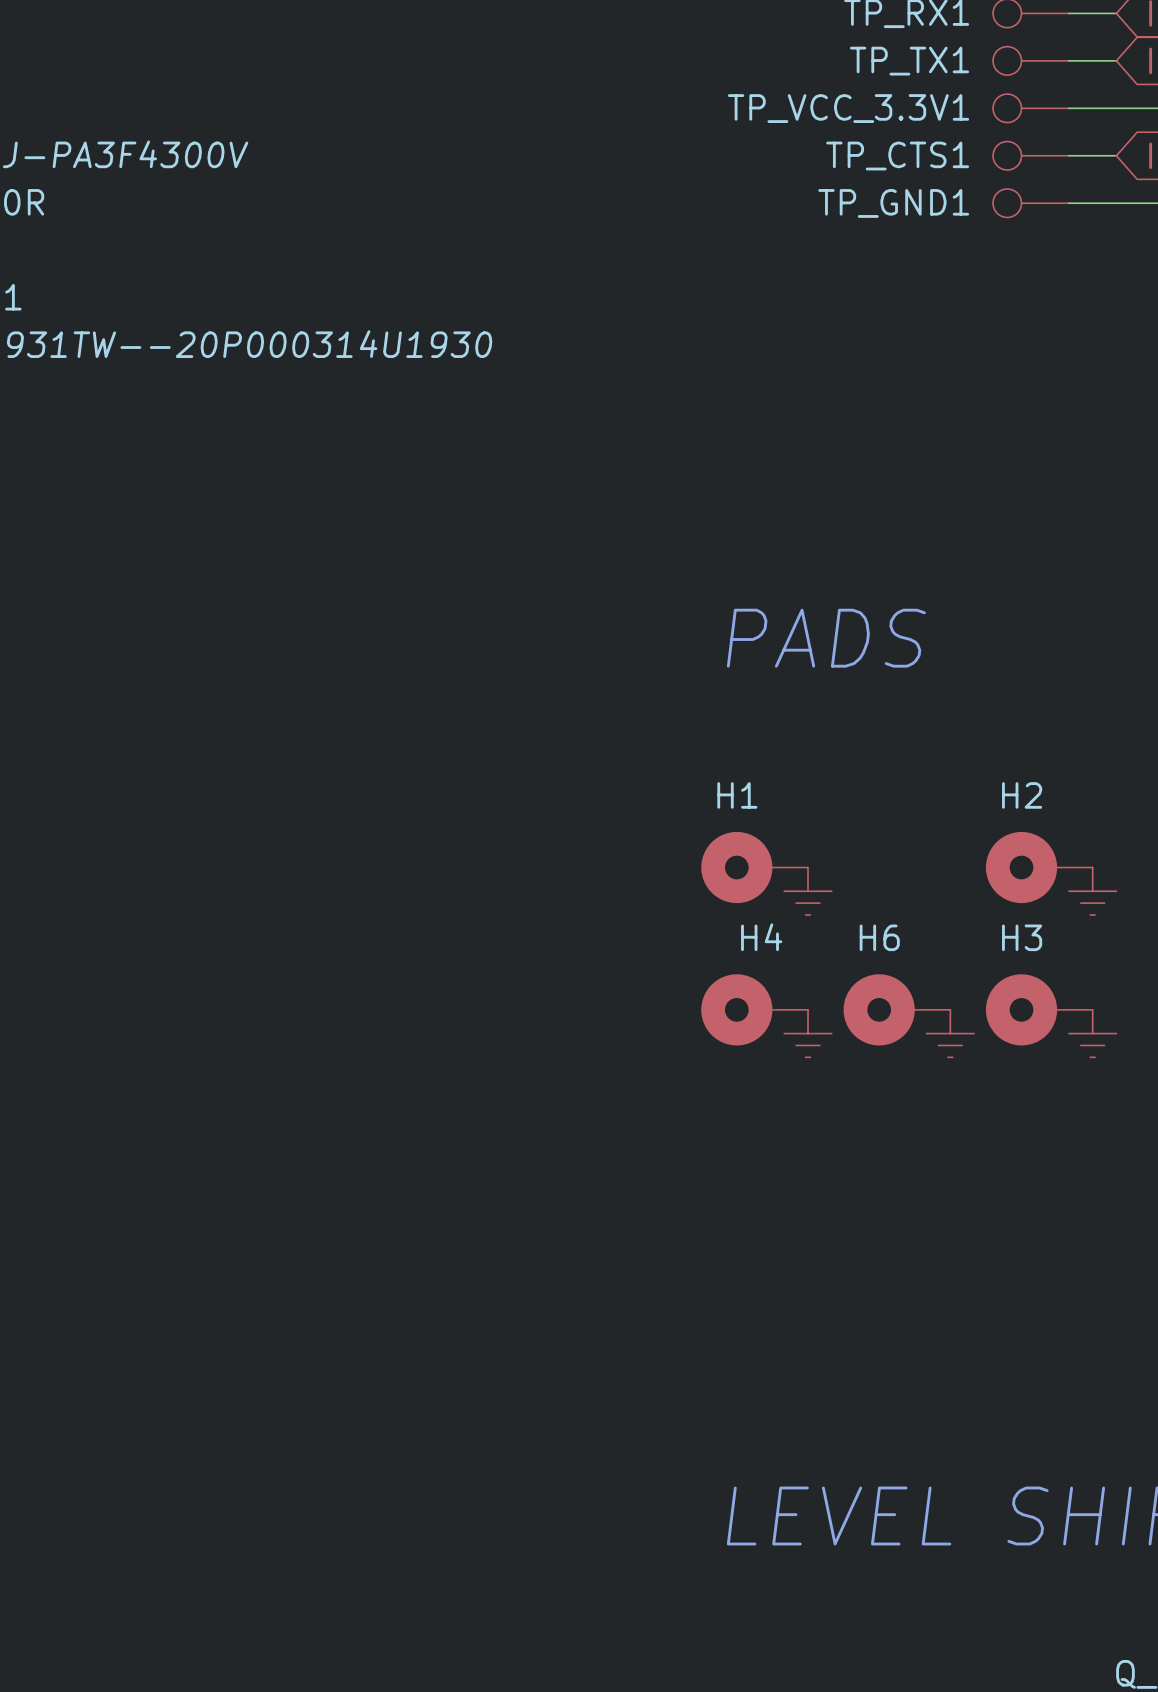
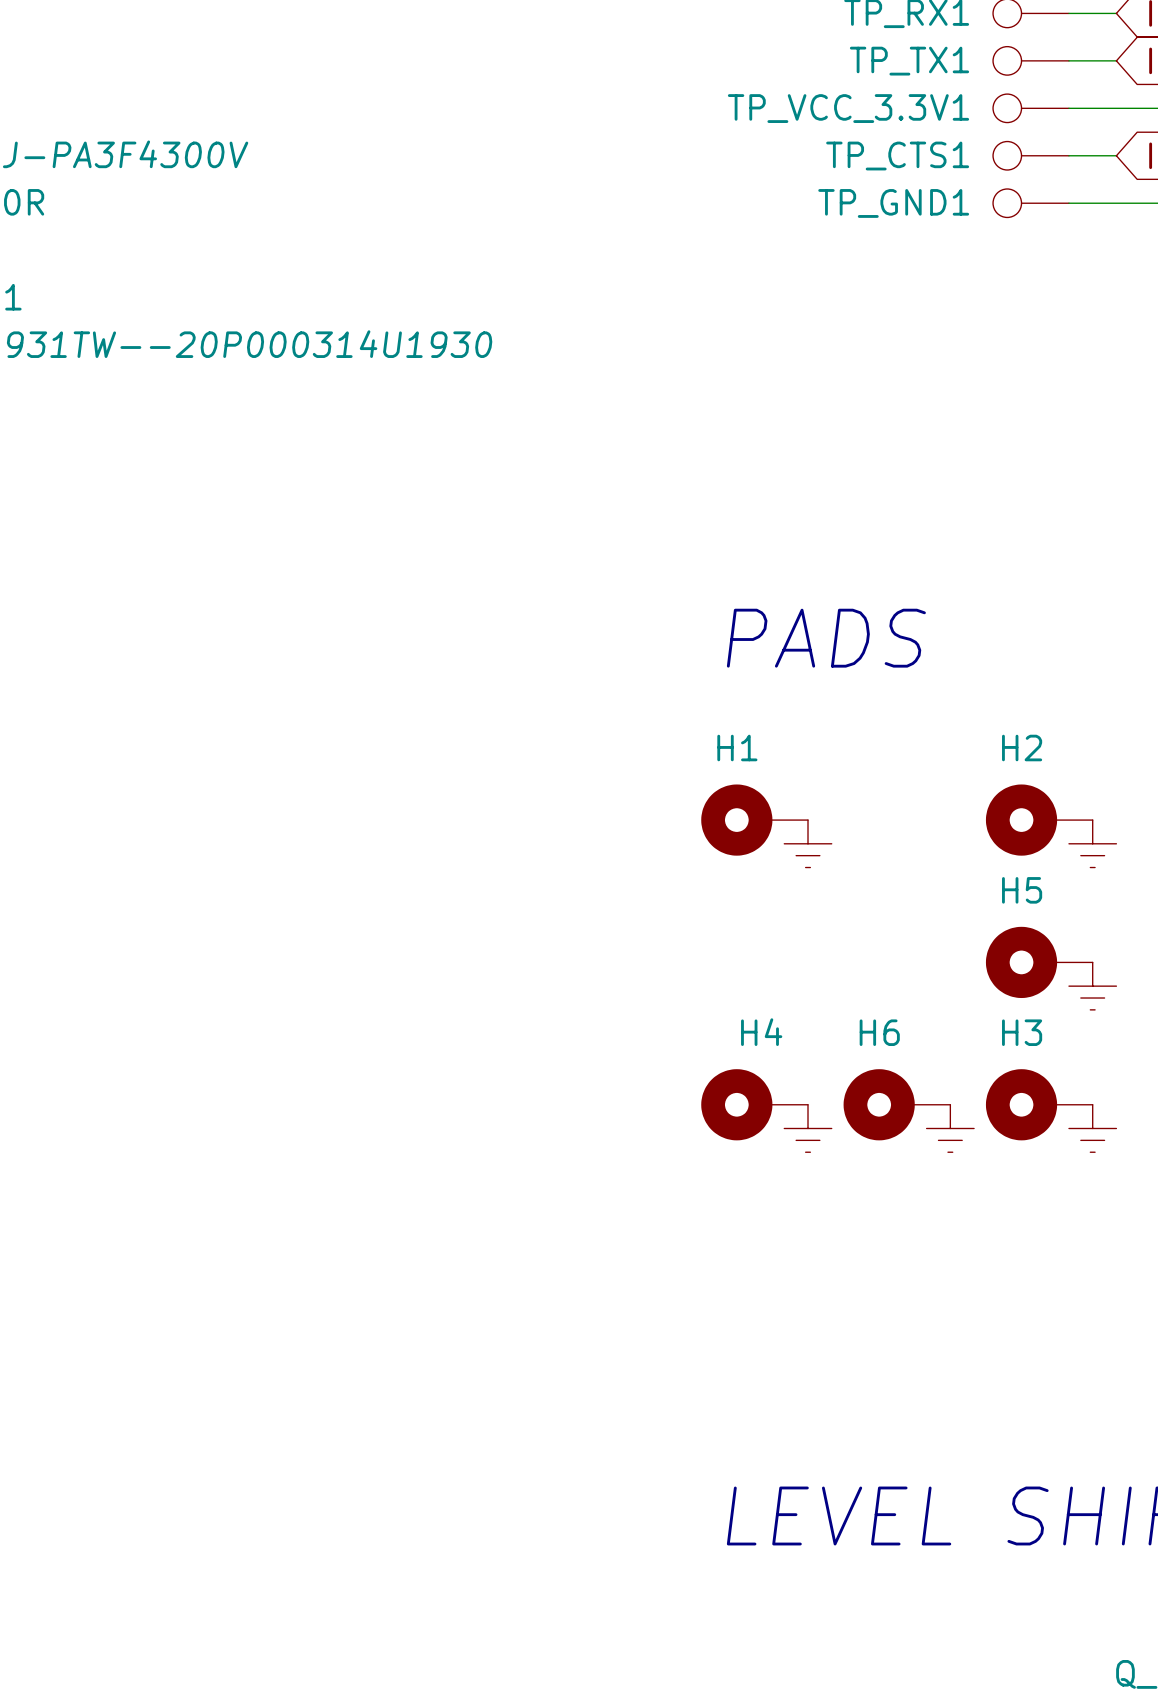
power symbol: none -> (1092, 843)
H1 position: (754, 867) -> (754, 820)
H2 position: (1039, 867) -> (1039, 820)
power symbol position: (808, 891) -> (808, 843)
power symbol: (1092, 891) -> none
H5: none -> (1039, 962)
power symbol: none -> (1092, 986)
H4 position: (754, 1009) -> (754, 1104)
H6 position: (896, 1009) -> (896, 1104)
H3 position: (1039, 1009) -> (1039, 1104)
power symbol: (808, 1033) -> none
power symbol: (950, 1033) -> none
power symbol: (1092, 1033) -> none
power symbol: none -> (808, 1128)
power symbol: none -> (950, 1128)
power symbol: none -> (1092, 1128)

